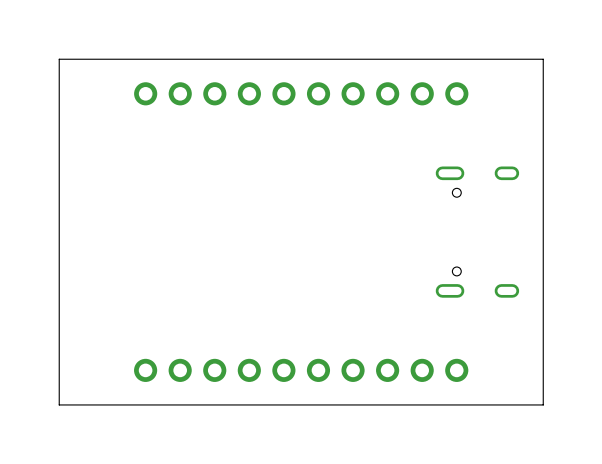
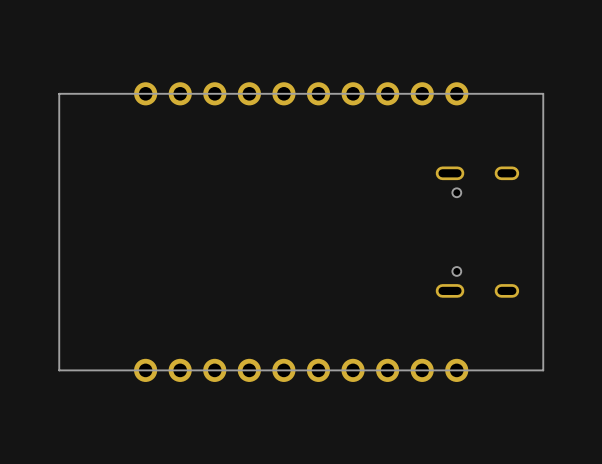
board edge: (543, 93) (543, 59) (59, 59) (59, 93) -> (543, 93) (59, 93)
board edge: (543, 370) (543, 404) (59, 404) (59, 370) -> (543, 370) (59, 370)

